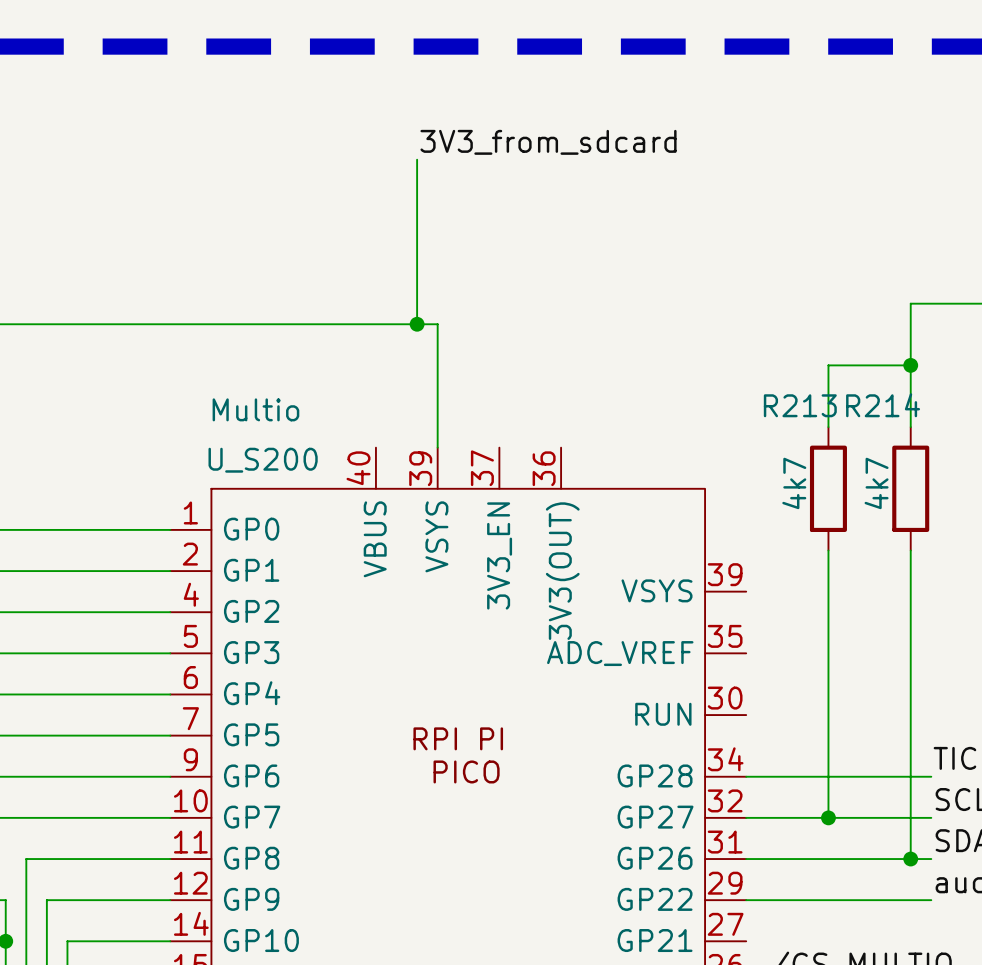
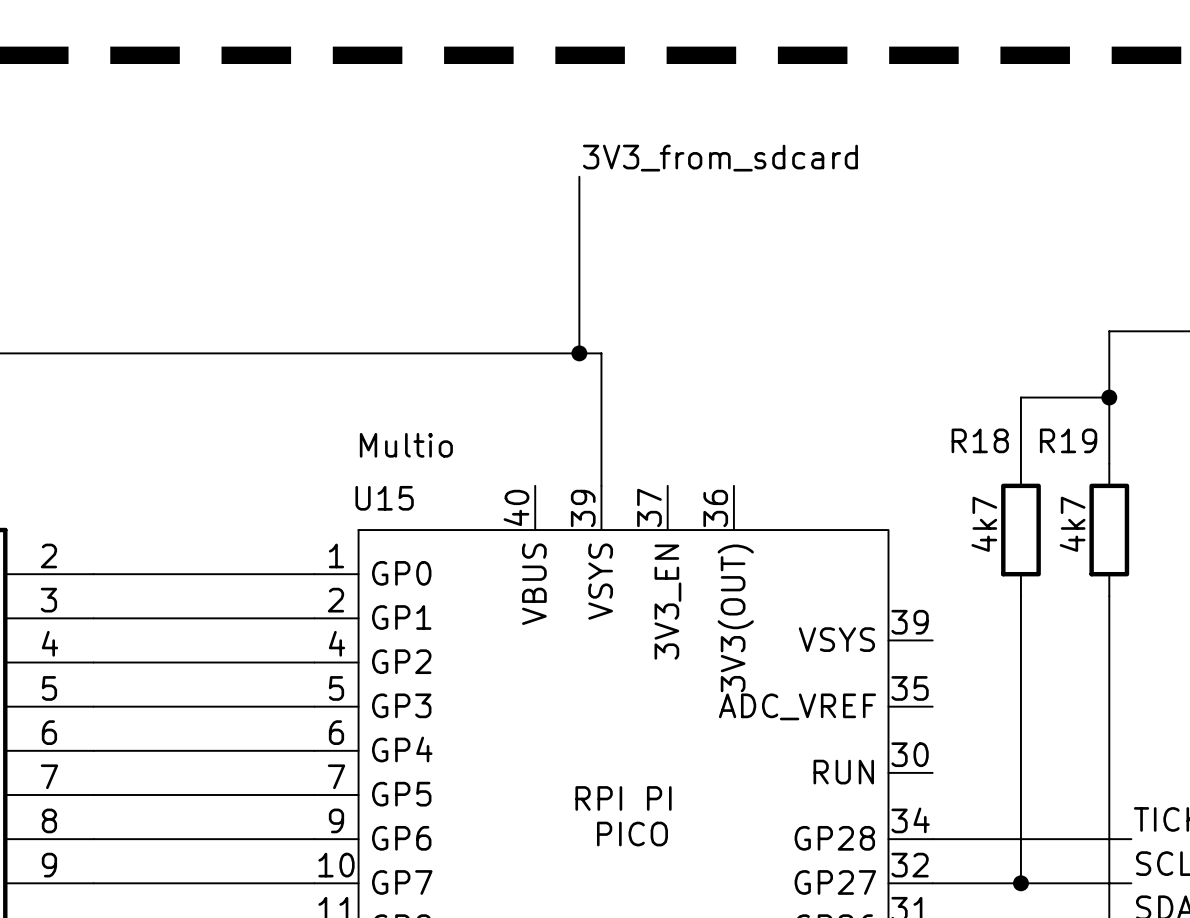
R213 name: R213 (800, 405) -> R18 (980, 440)
R214 name: R214 (883, 405) -> R19 (1068, 440)
U_S200 name: U_S200 (263, 460) -> U15 (384, 498)

